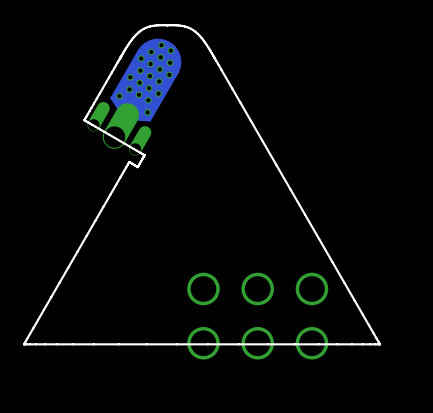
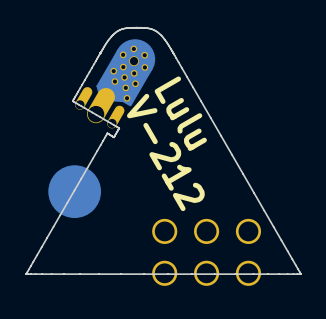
part footprint: [87, 38, 182, 156] -> [75, 39, 156, 129]
text: none -> Lulu (180, 113)
text: none -> V-212 (165, 152)
part: none -> (74, 191)

